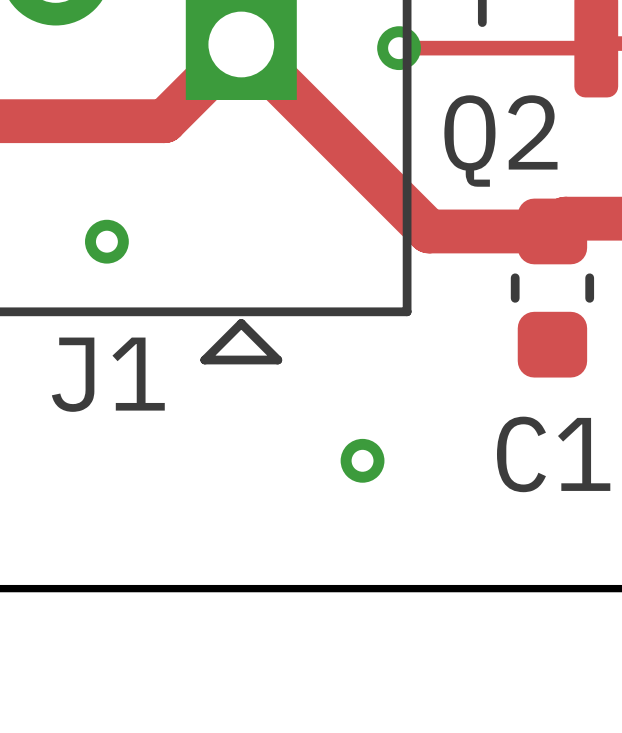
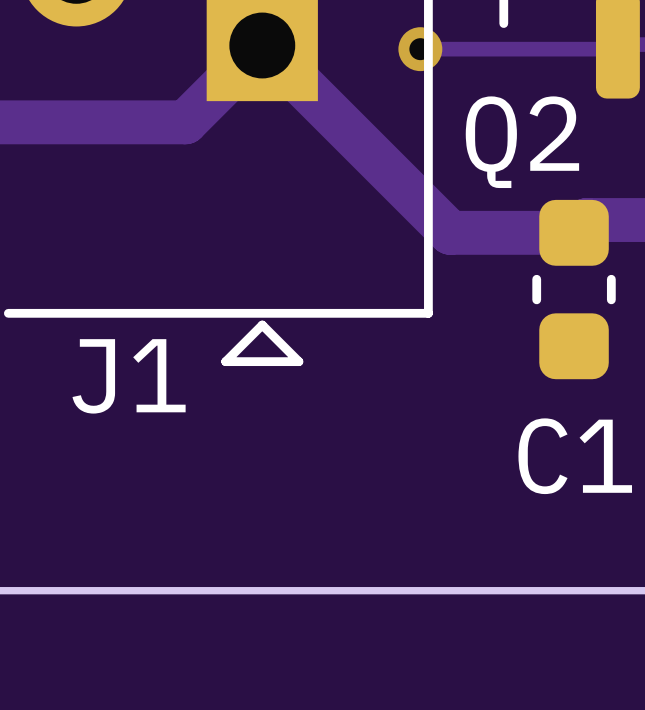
via: (106, 241) -> none
via: (362, 460) -> none

